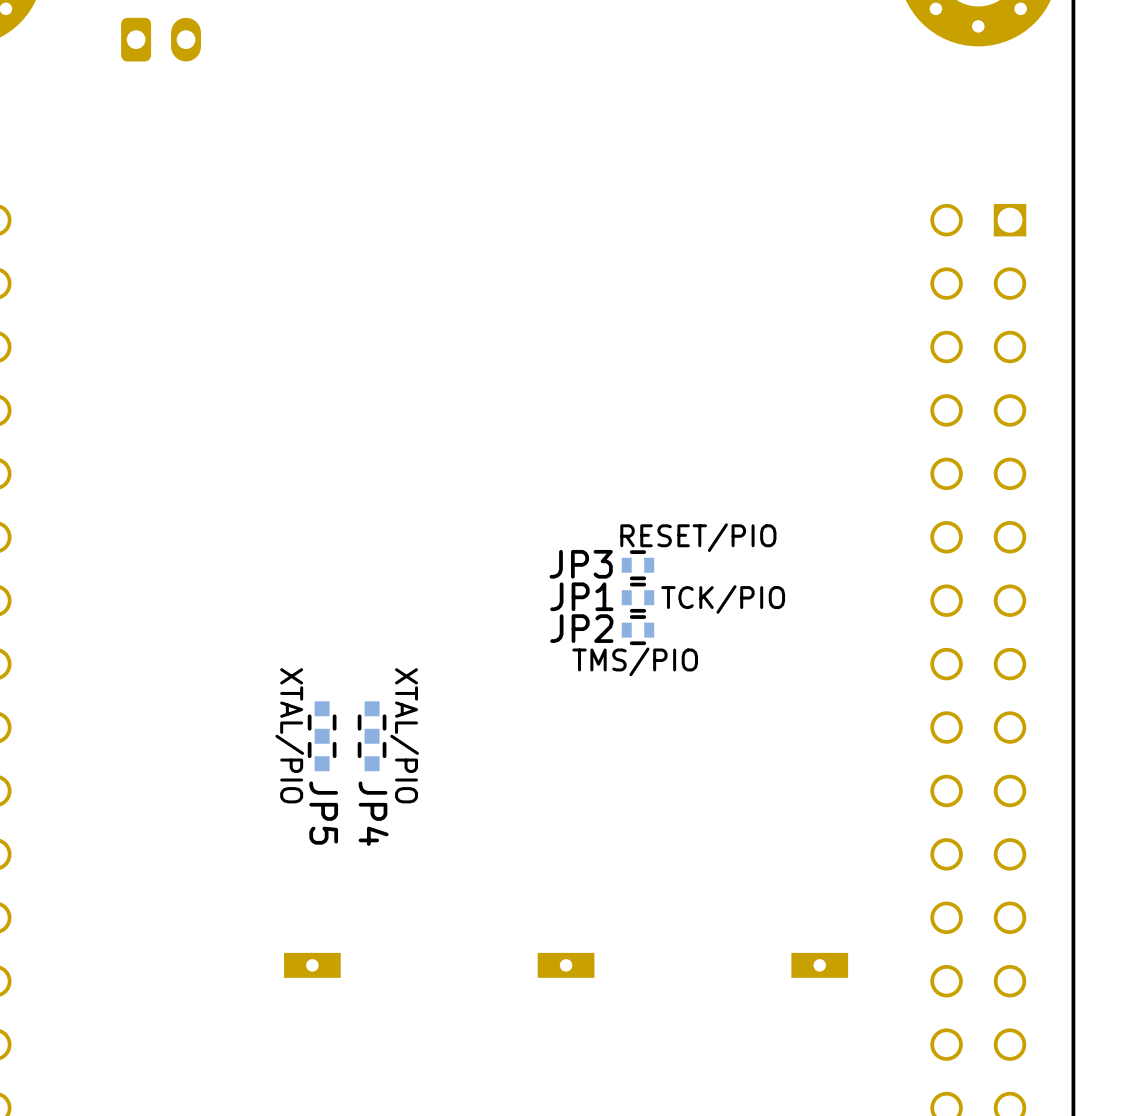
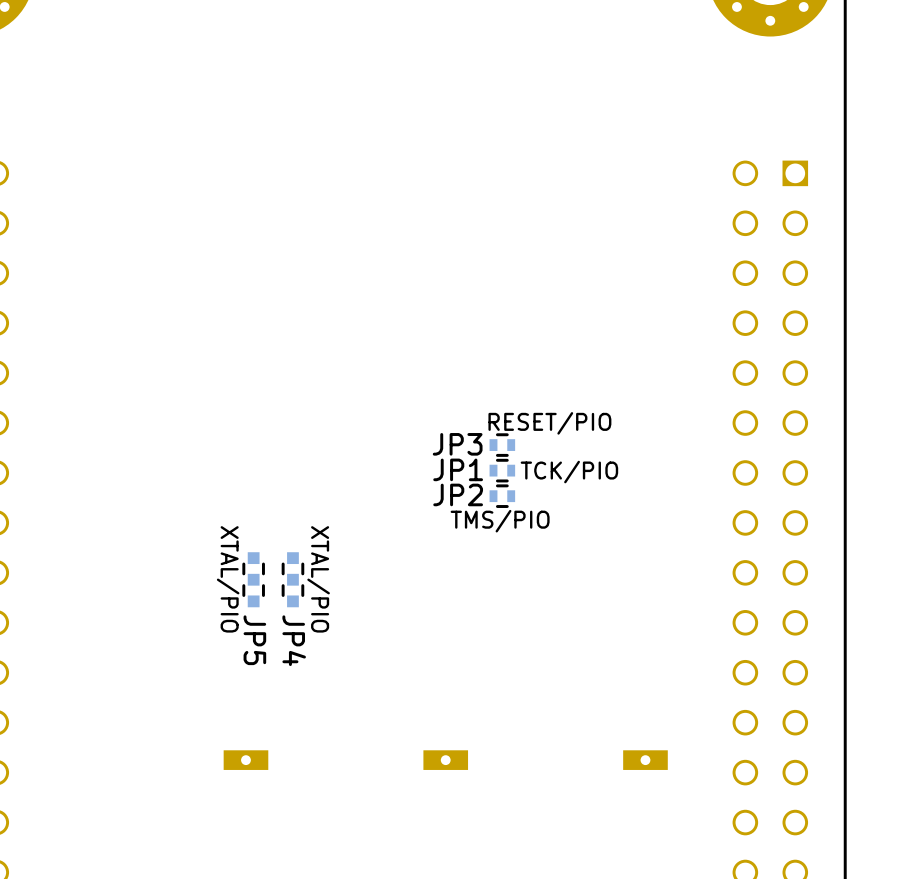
part: (161, 39) -> none

